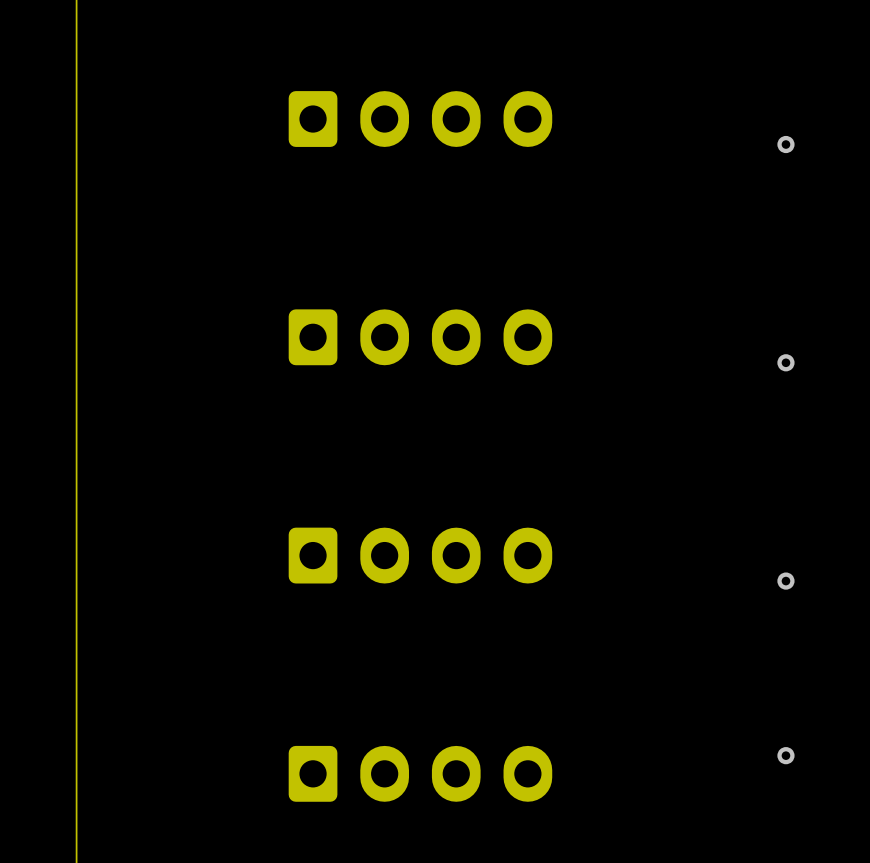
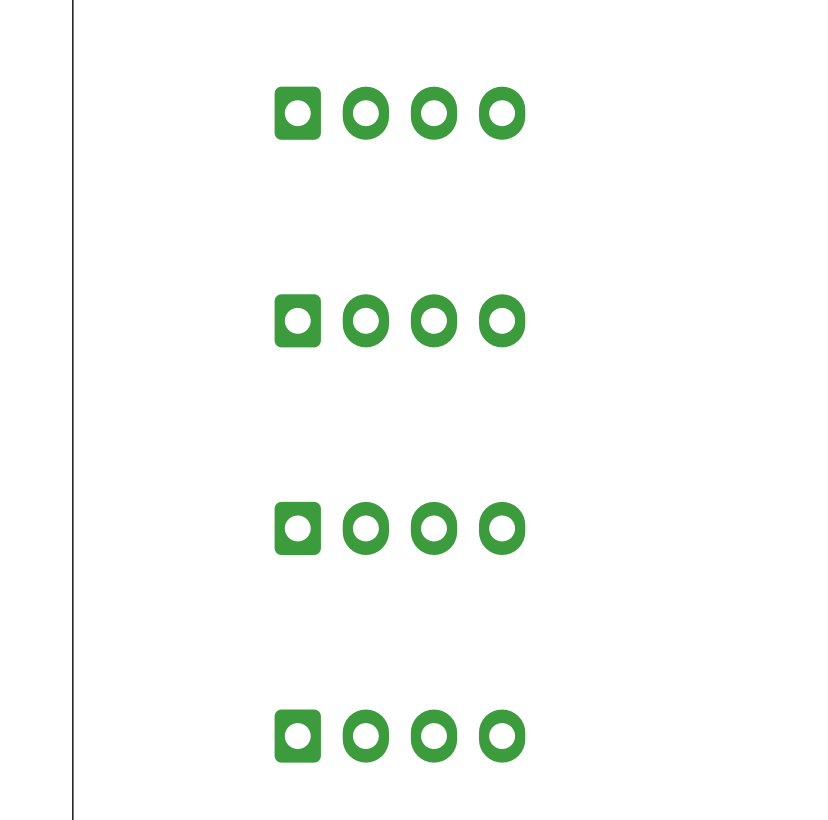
via: (785, 144) -> none
via: (785, 362) -> none
via: (785, 581) -> none
via: (785, 755) -> none

